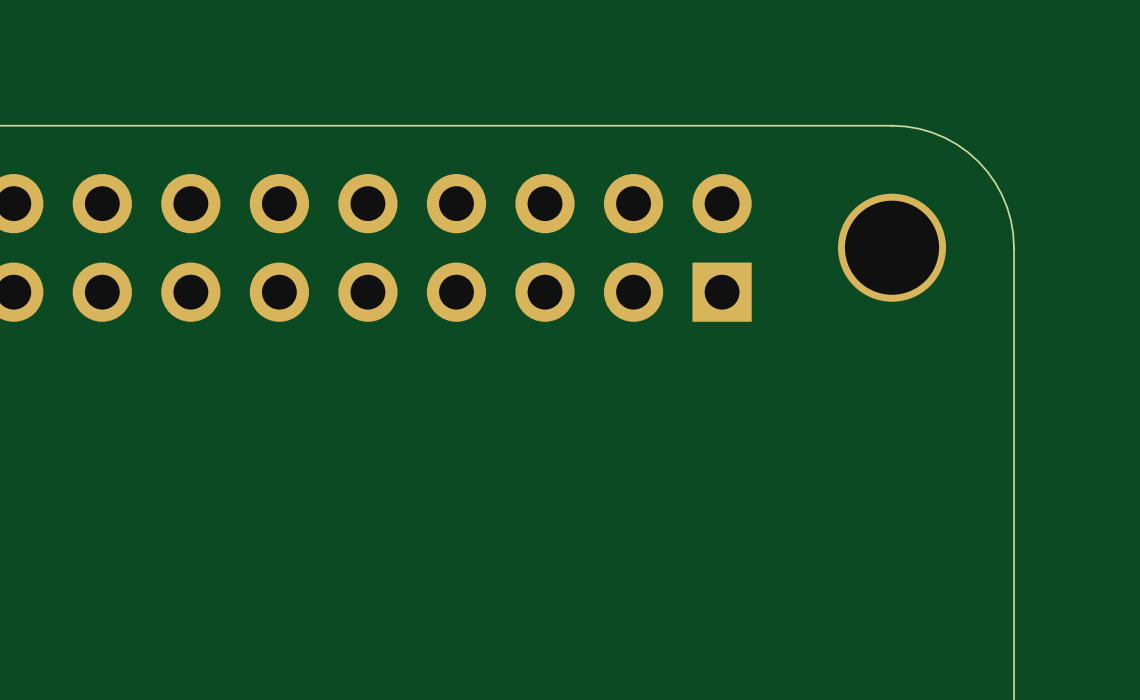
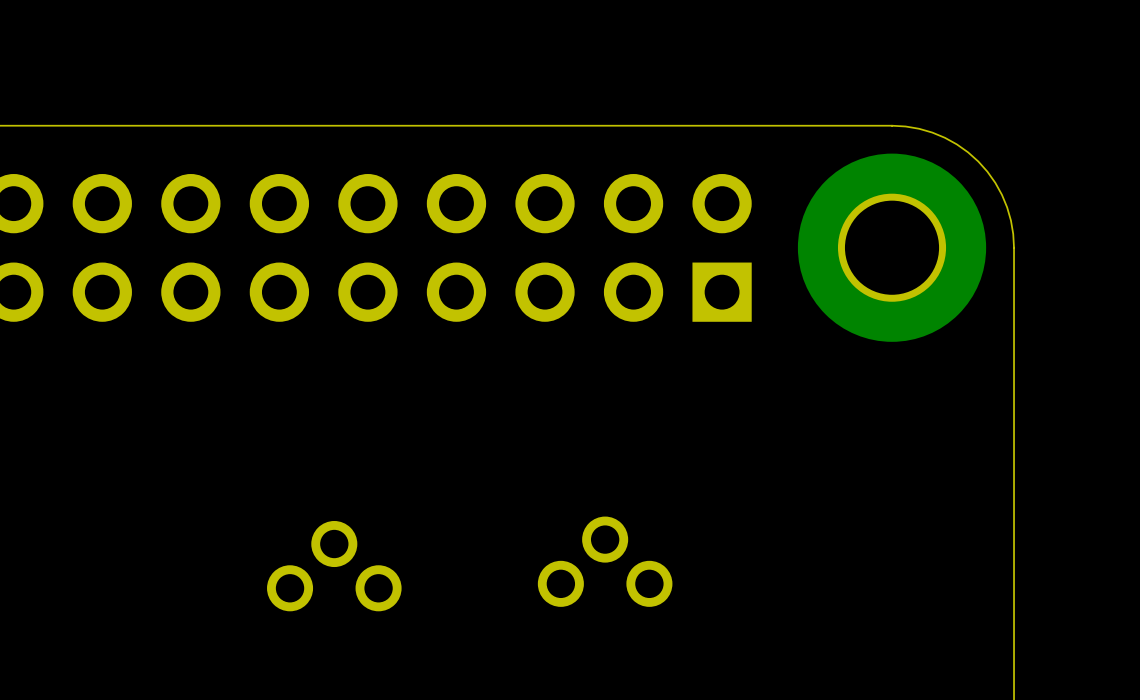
part footprint: [837, 193, 947, 302] -> [797, 153, 987, 342]
part: none -> (605, 561)
part: none -> (334, 566)

